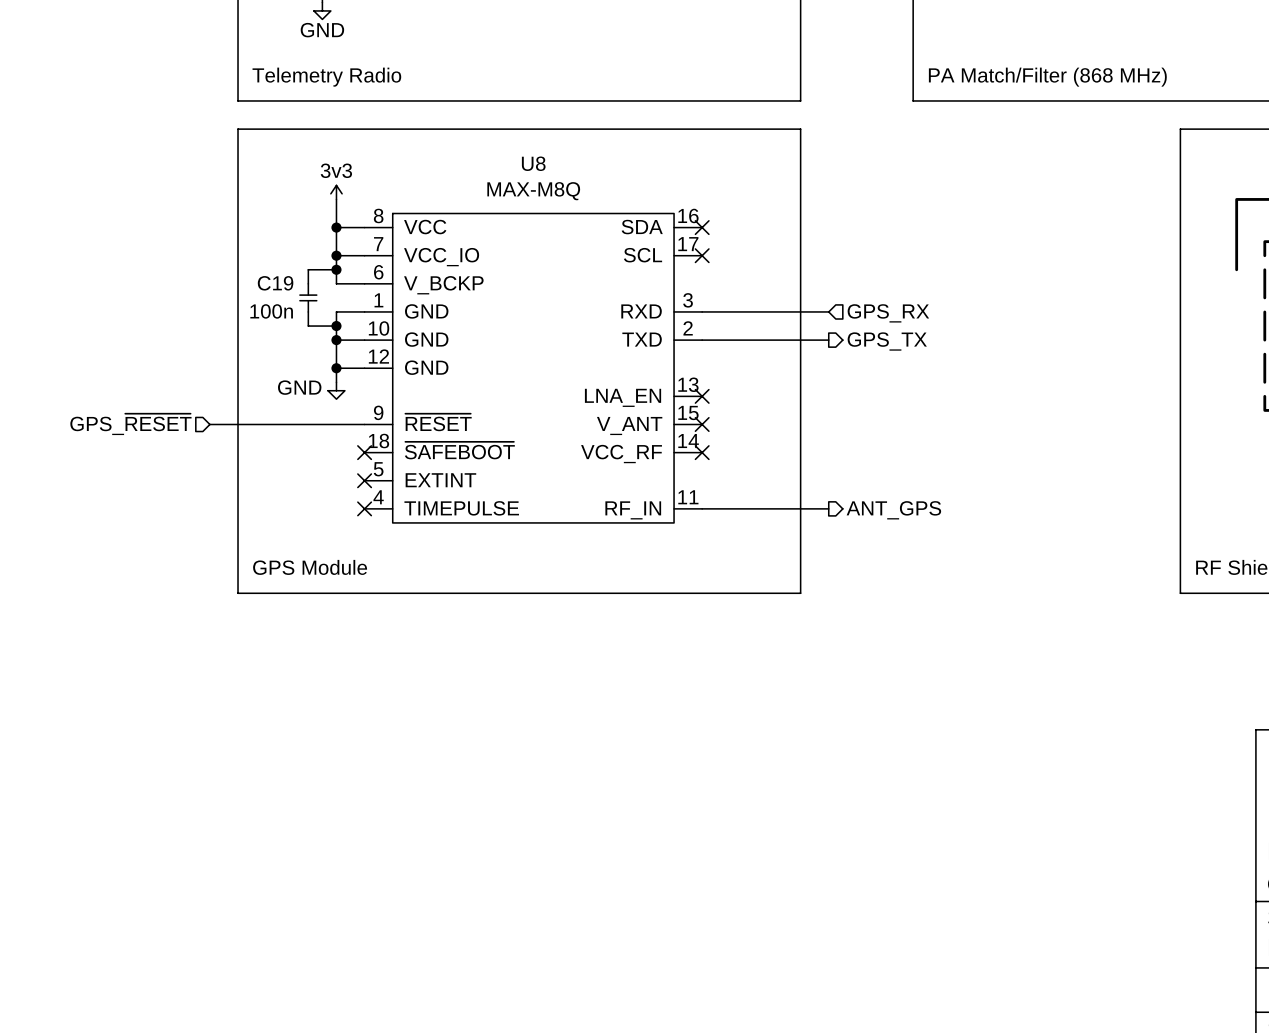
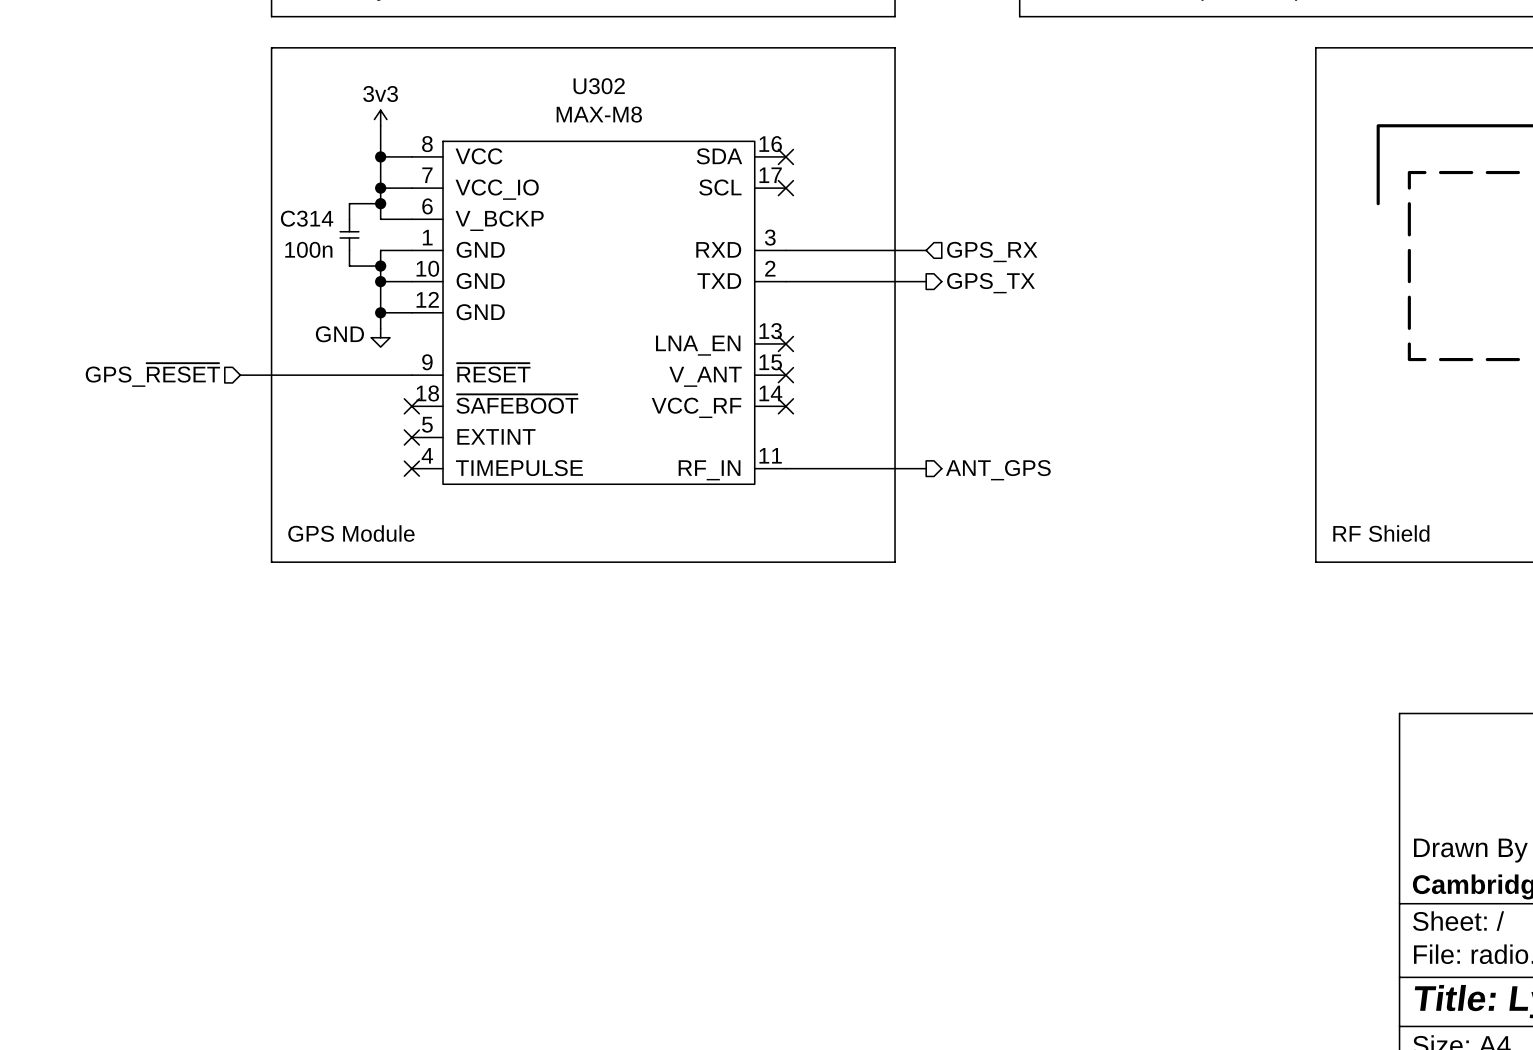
U8 name: U8 (533, 163) -> U302 (599, 86)
U8 value: MAX-M8Q (533, 191) -> MAX-M8 (599, 114)
C19 name: C19 (275, 283) -> C314 (307, 218)

